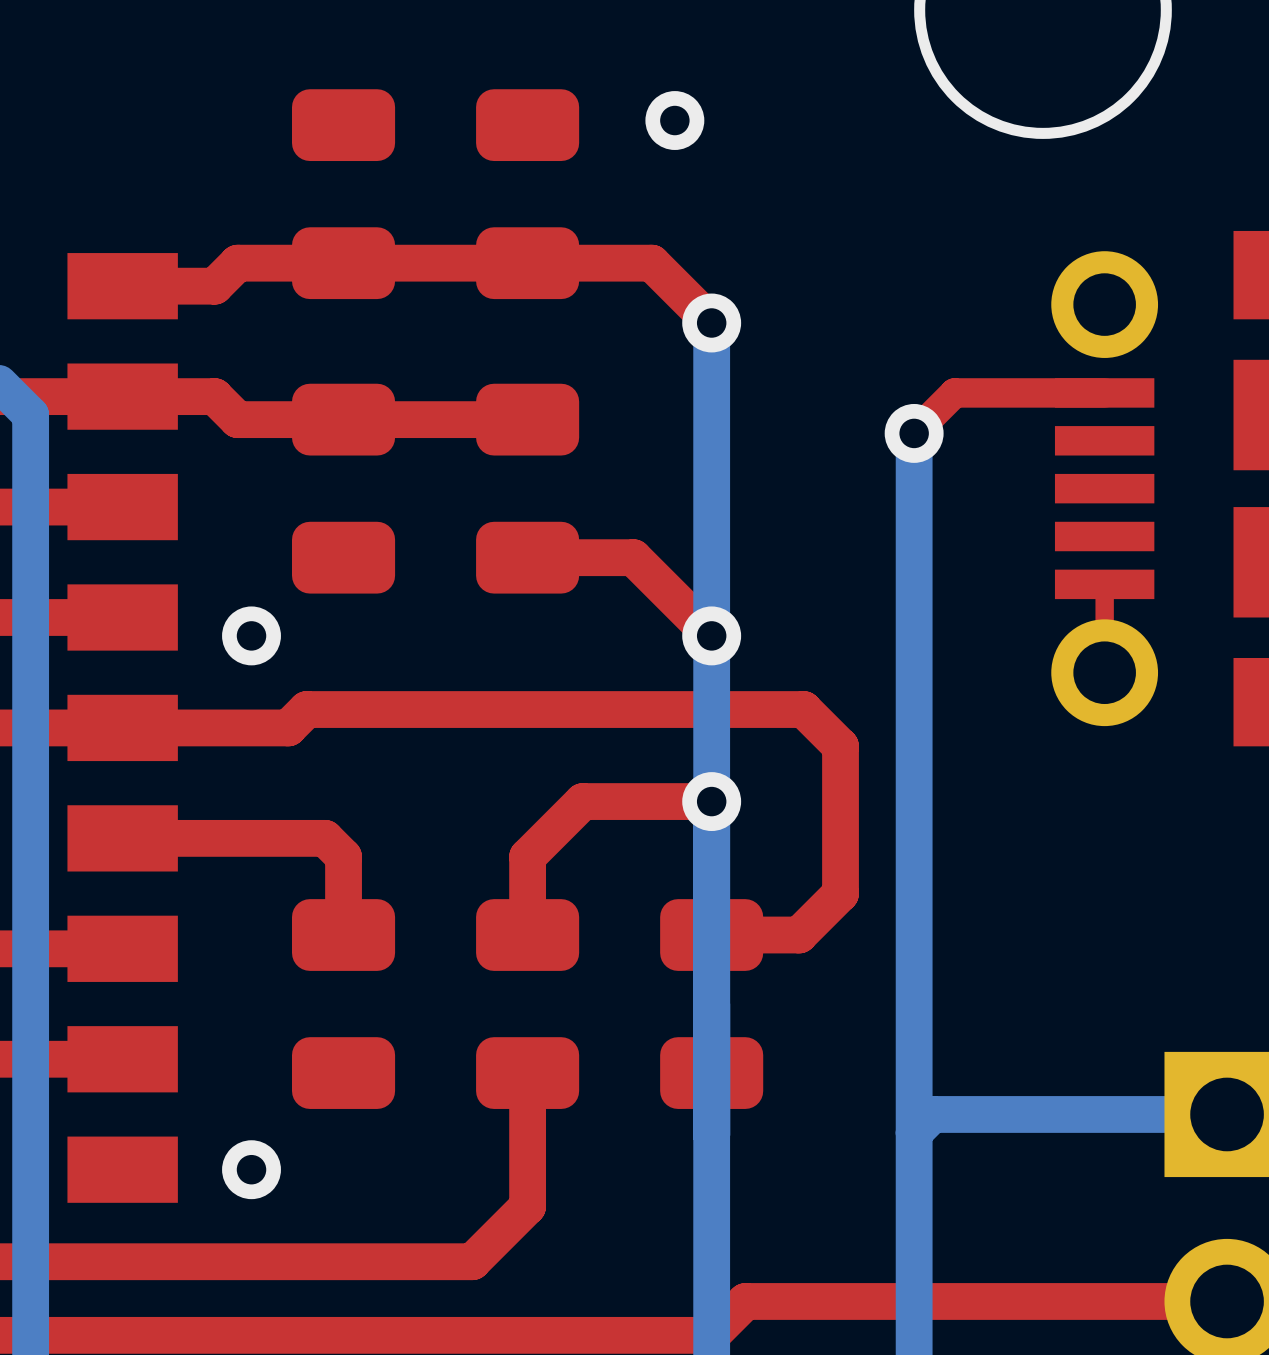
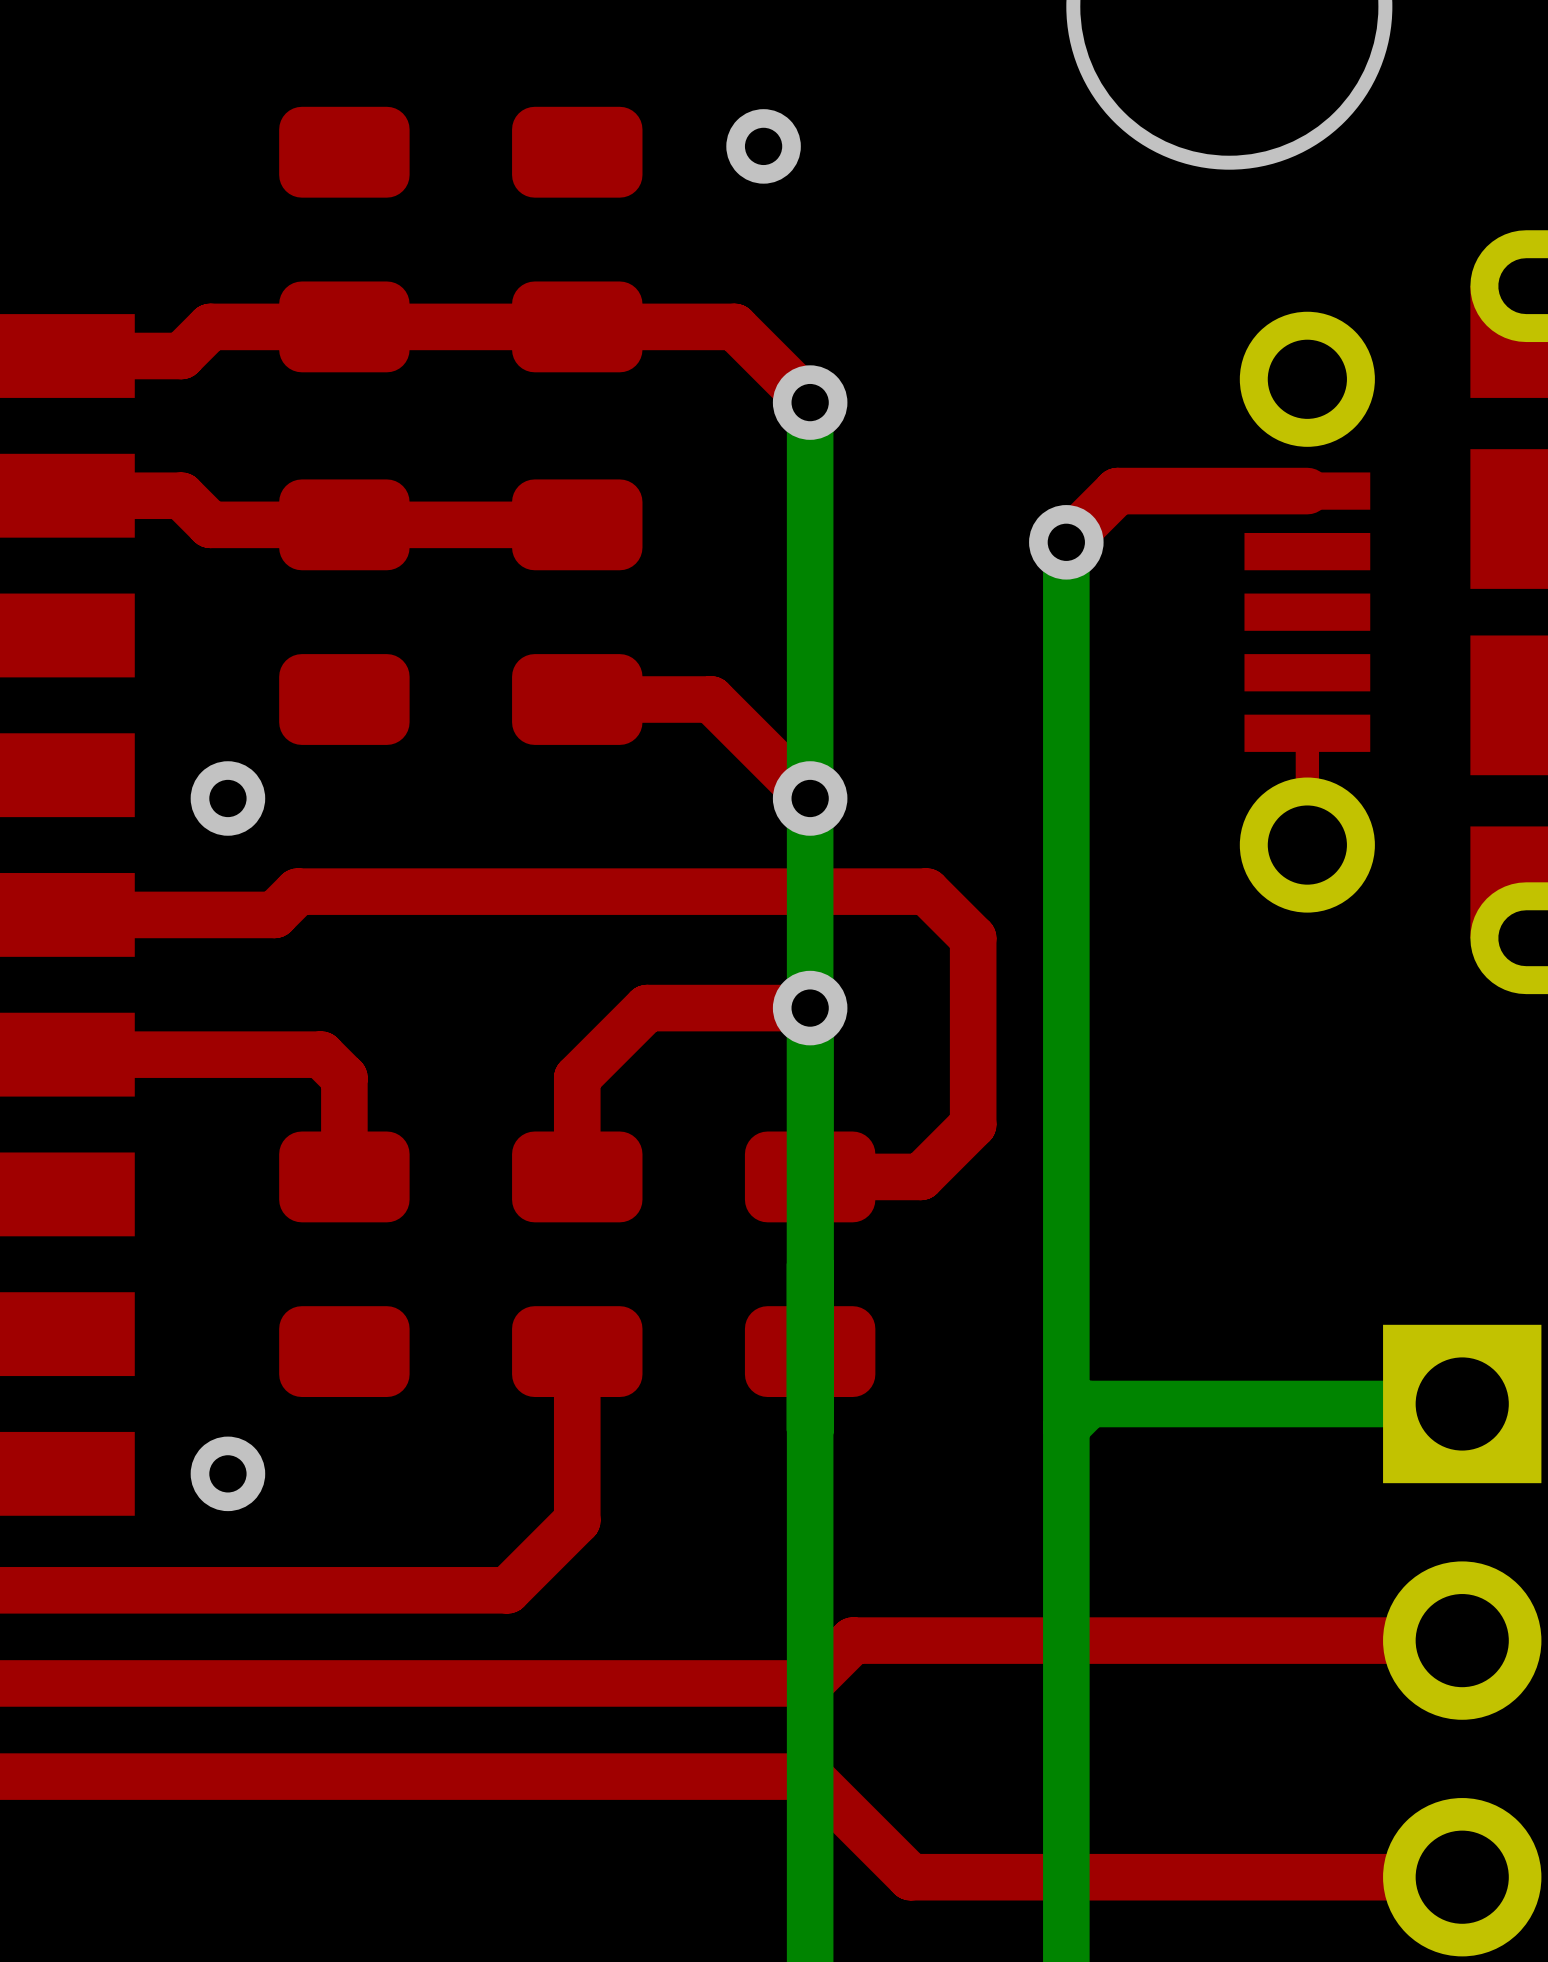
top track width: thin (1104, 392) (954, 392) (914, 433) -> thick (1307, 491) (1117, 491) (1066, 542)

